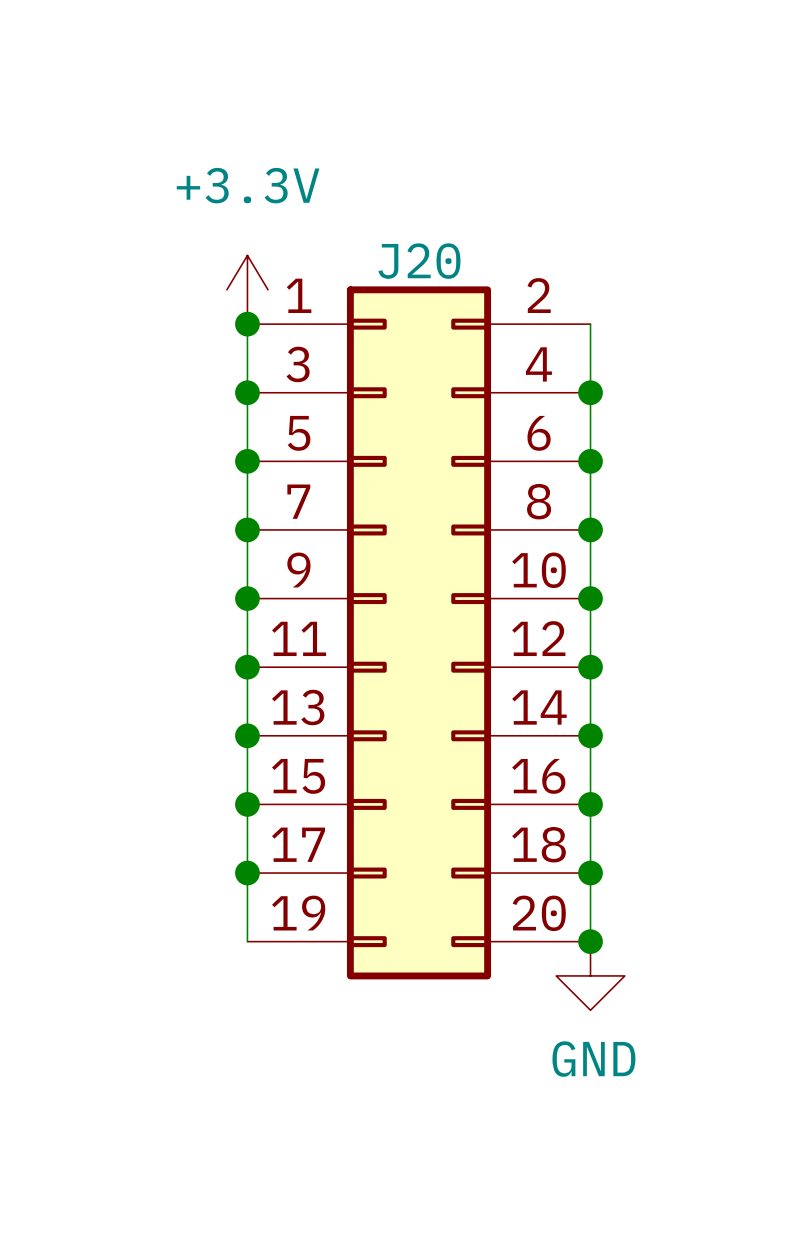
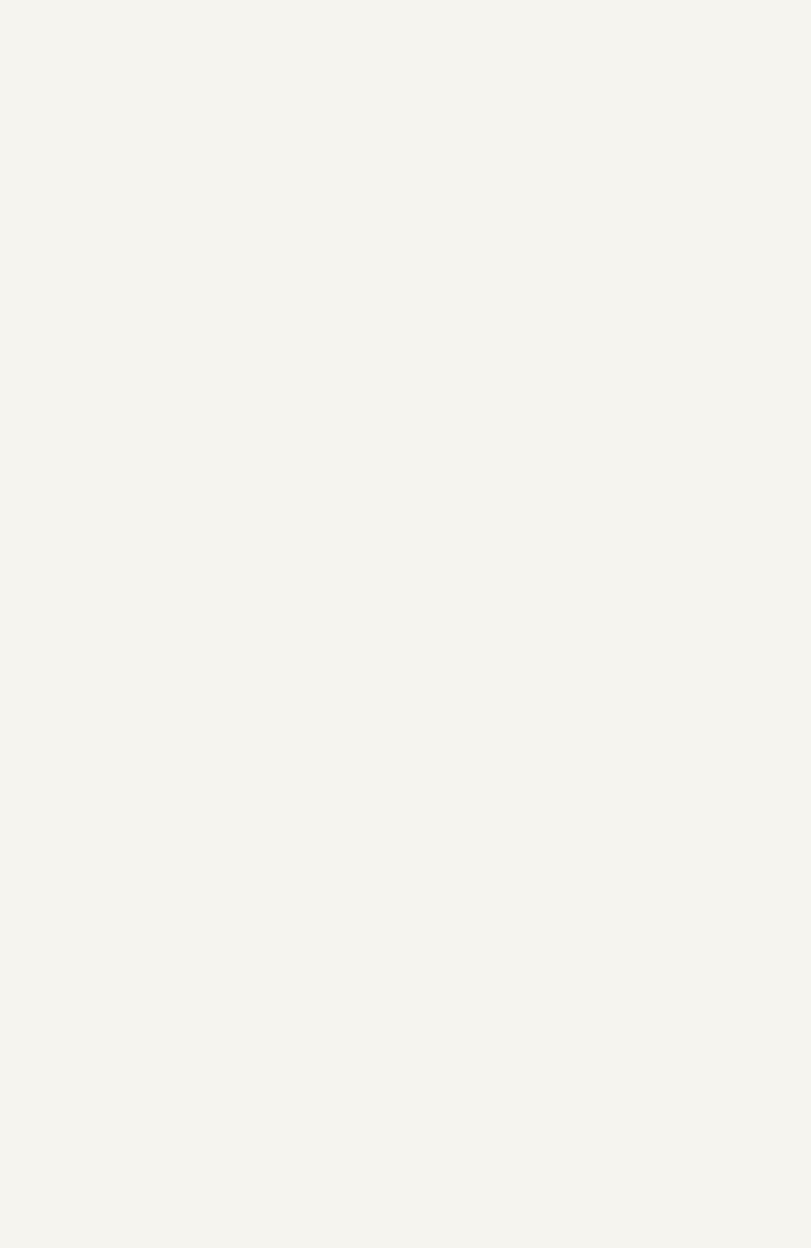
power symbol: +3.3V (247, 289) -> none
wire: (247, 324) (247, 941) -> none
junction: (247, 324) -> none
wire: (590, 324) (590, 941) -> none
junction: (247, 392) -> none
junction: (590, 392) -> none
junction: (247, 461) -> none
junction: (590, 461) -> none
junction: (247, 529) -> none
junction: (590, 529) -> none
junction: (247, 598) -> none
junction: (590, 598) -> none
J20: (418, 632) -> none
junction: (247, 667) -> none
junction: (590, 667) -> none
junction: (247, 735) -> none
junction: (590, 735) -> none
junction: (247, 804) -> none
junction: (590, 804) -> none
junction: (247, 873) -> none
junction: (590, 873) -> none
junction: (590, 941) -> none
power symbol: GND (590, 975) -> none

